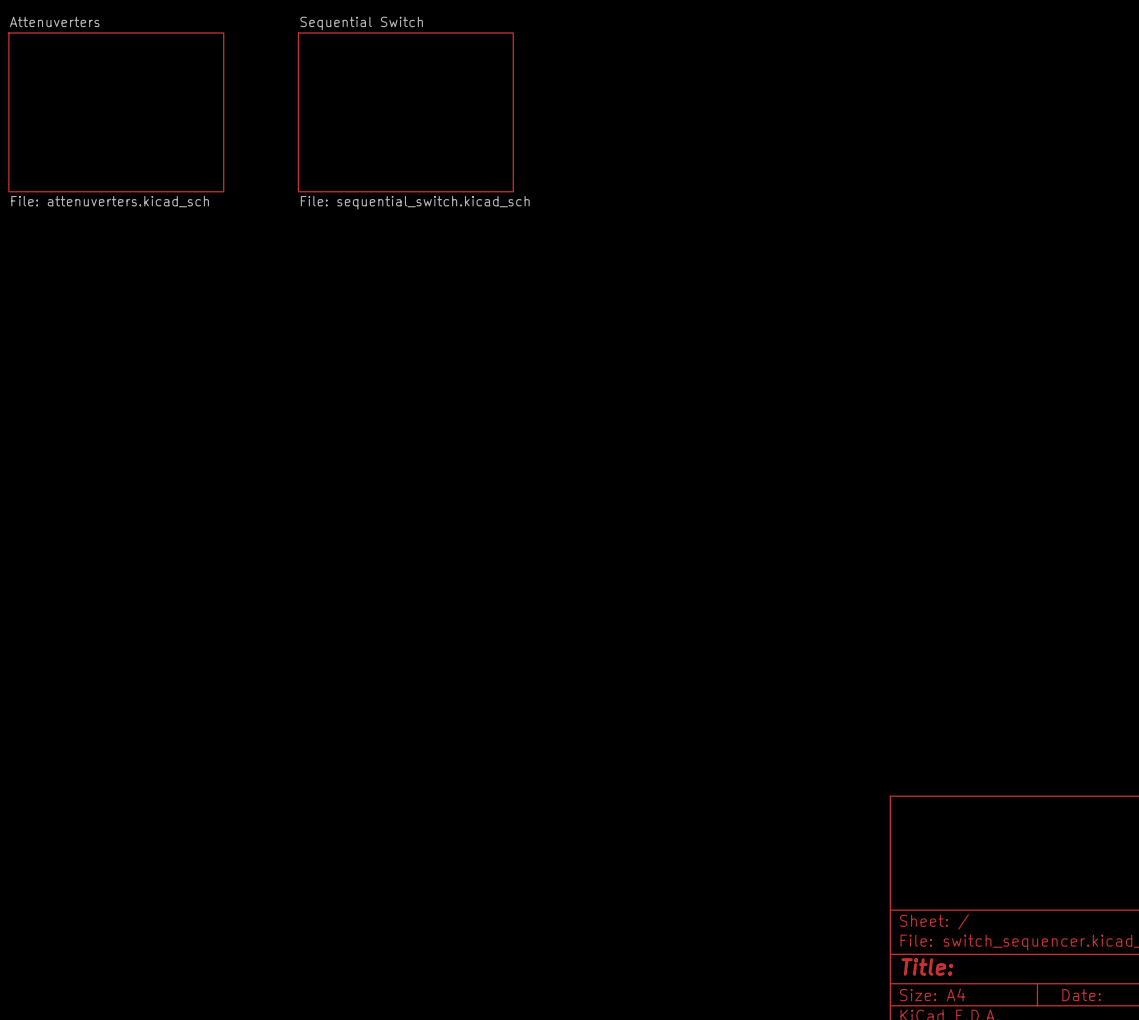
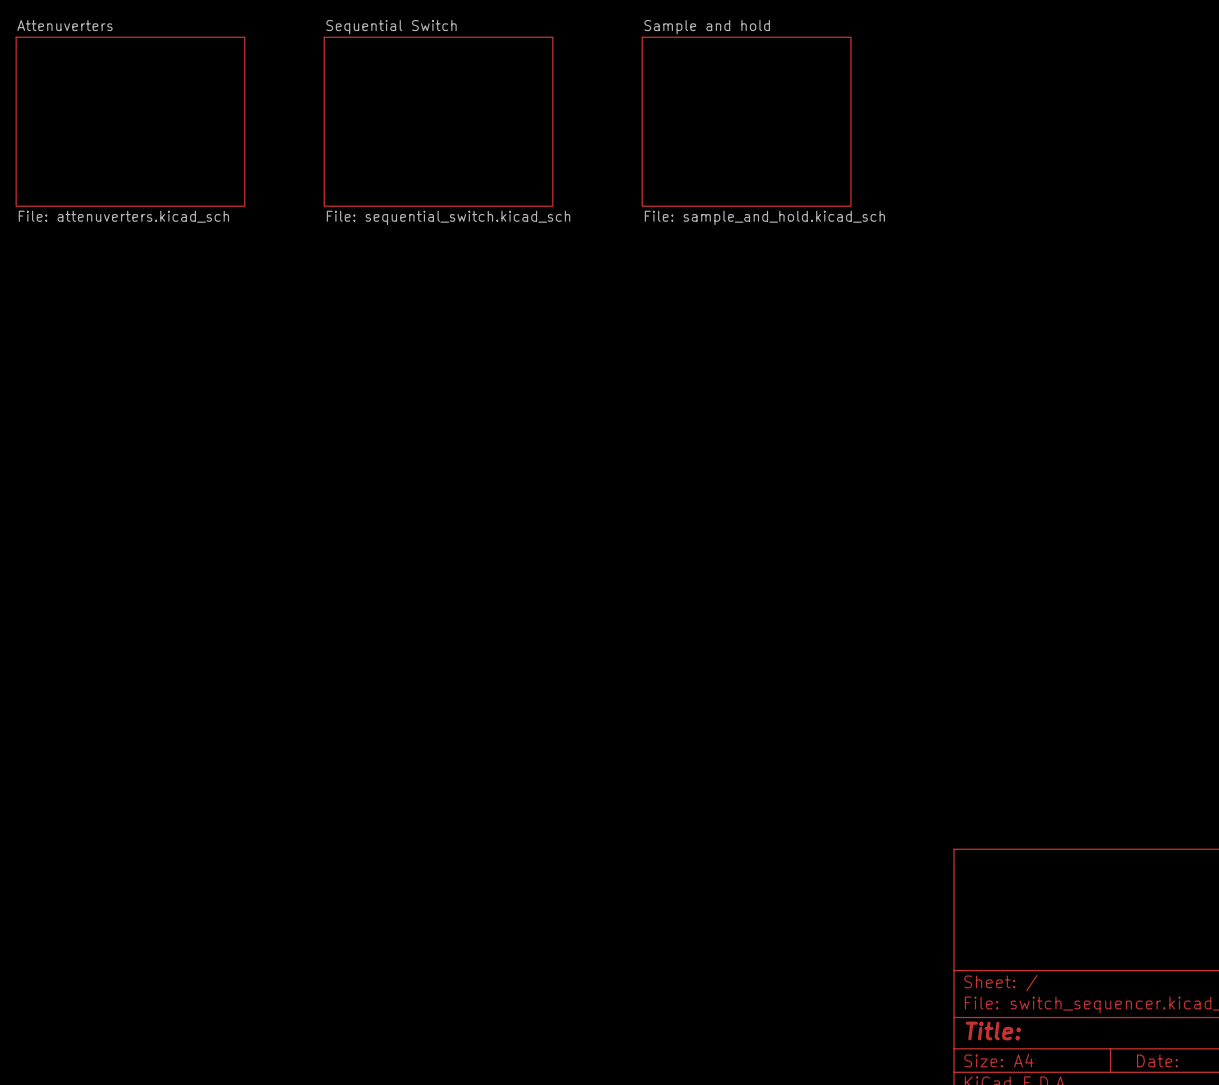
sheet Sample and hold: none -> File: sample_and_hold.kicad_sch (746, 121)

